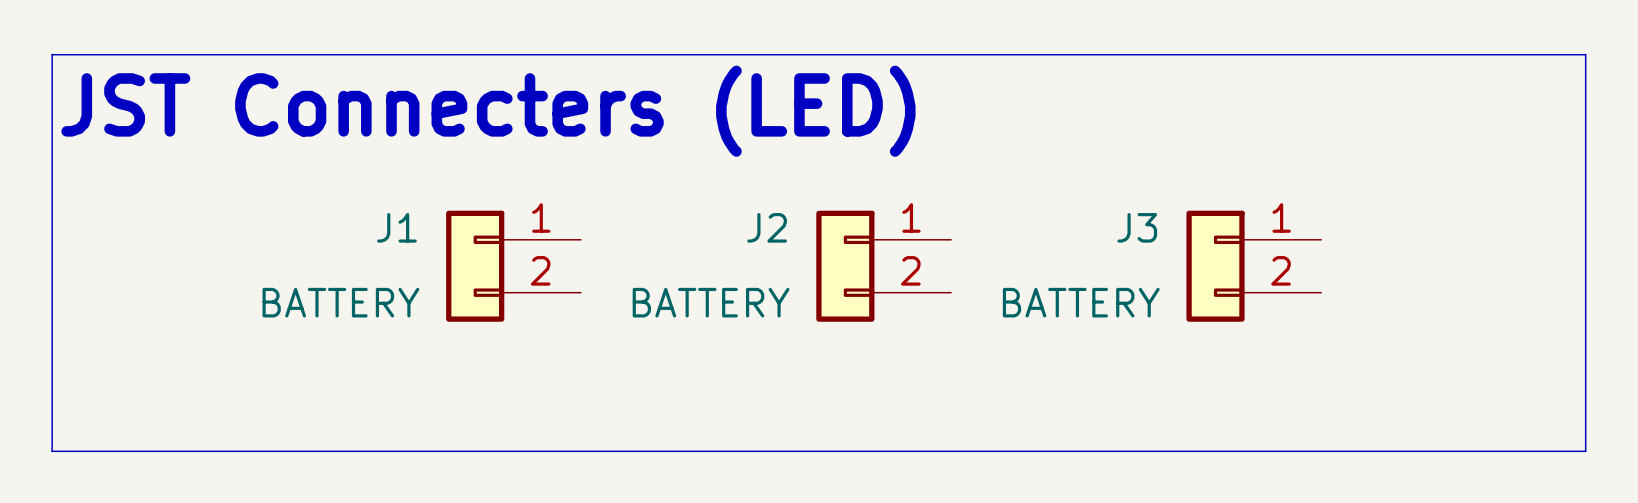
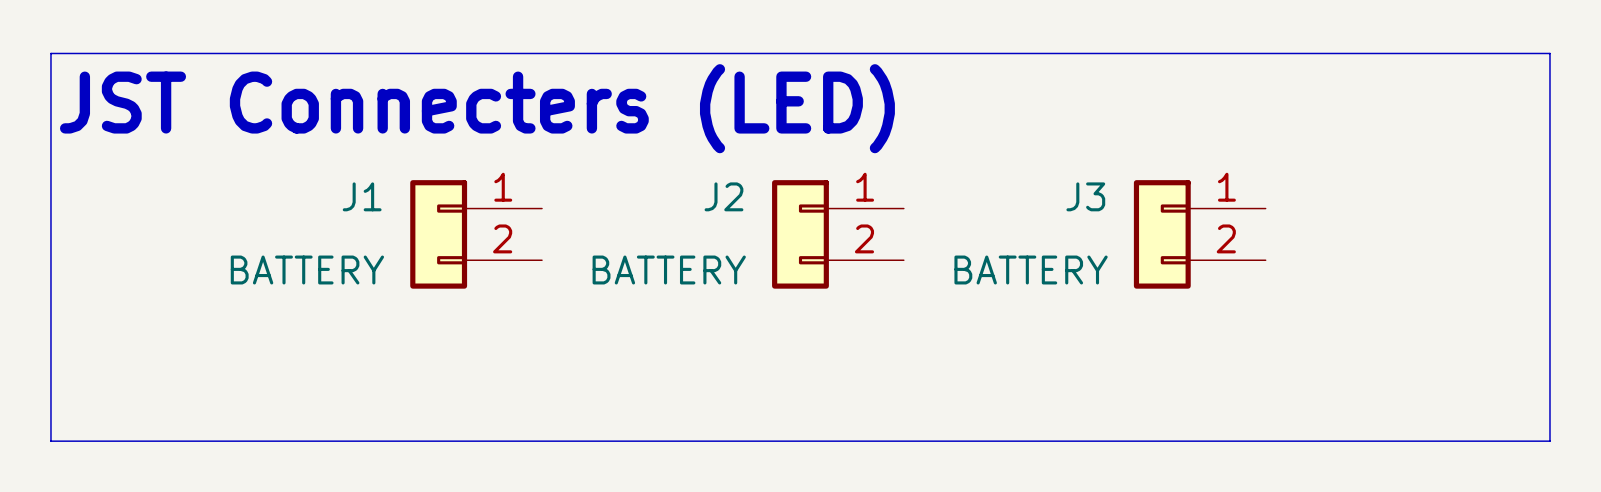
J1 position: (513, 266) -> (476, 234)
J2 position: (883, 266) -> (837, 234)
J3 position: (1253, 266) -> (1199, 234)

